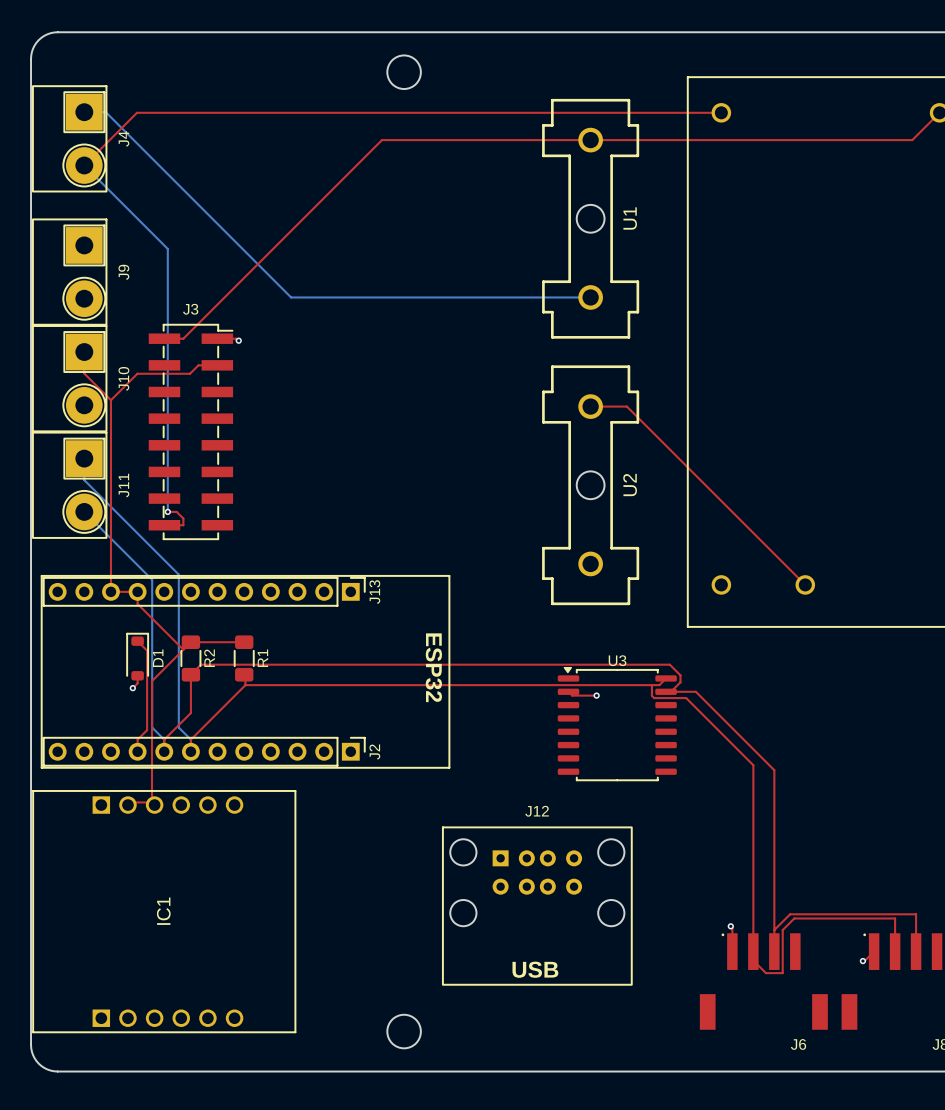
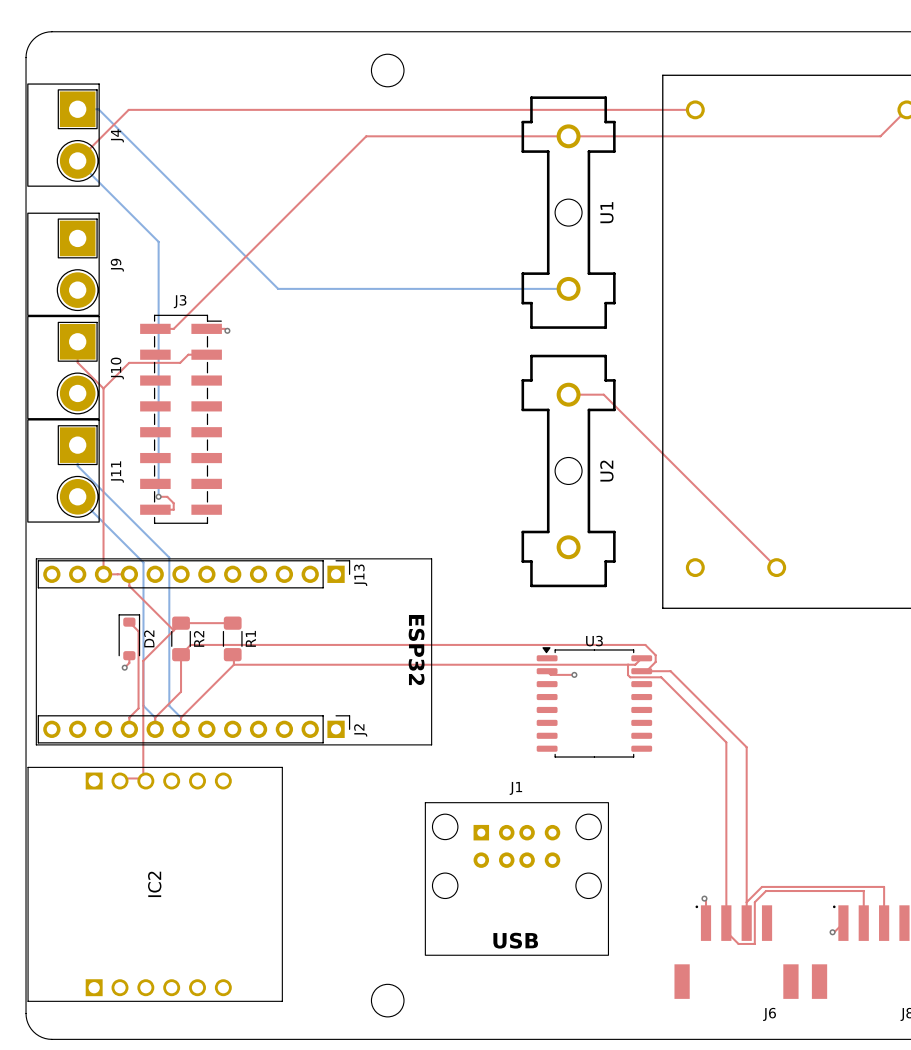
D1 name: D1 (158, 658) -> D2 (149, 638)
J12 name: J12 (537, 811) -> J1 (515, 788)
IC1 name: IC1 (163, 911) -> IC2 (154, 884)

